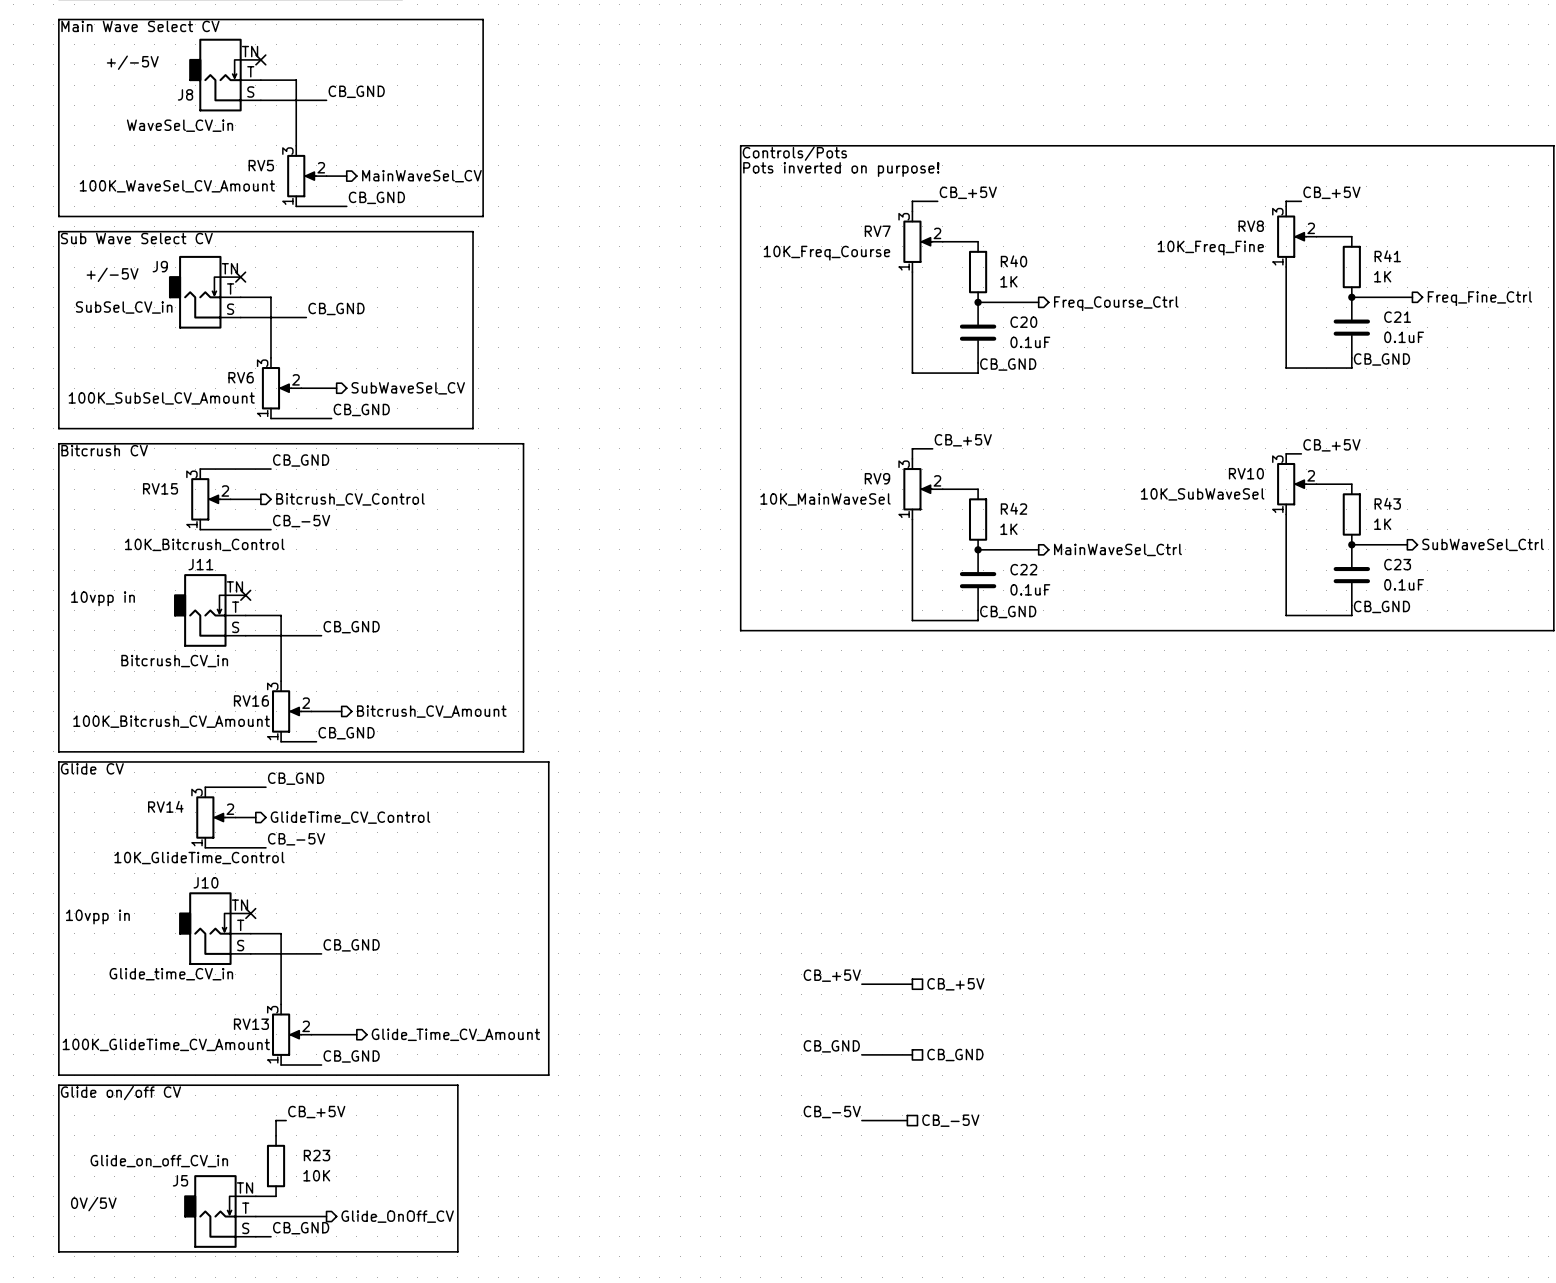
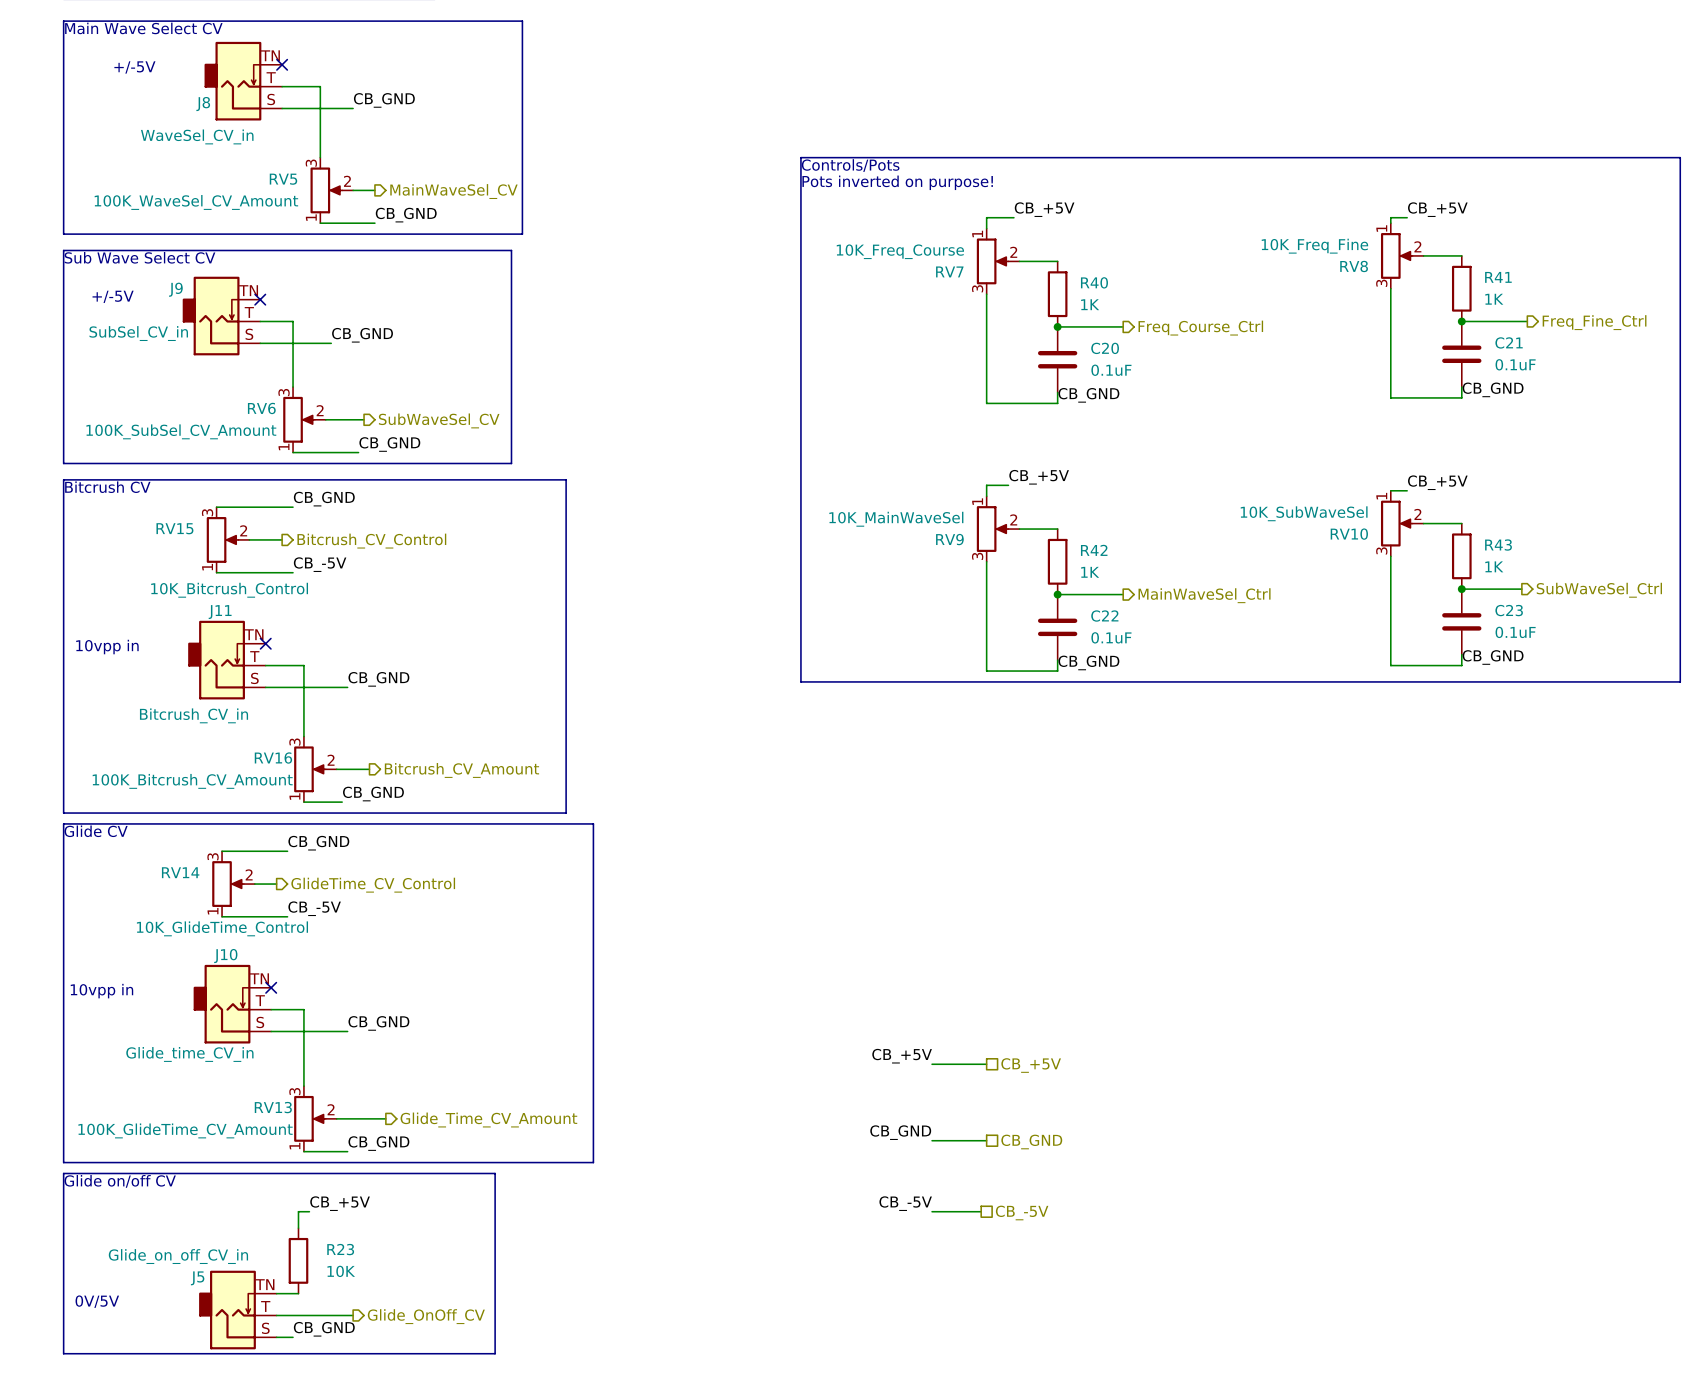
RV8 flip: as is (1291, 236) -> up-down (1396, 255)
RV7 flip: as is (917, 241) -> up-down (992, 261)
RV10 flip: as is (1291, 484) -> up-down (1396, 523)
RV9 flip: as is (917, 489) -> up-down (992, 529)

